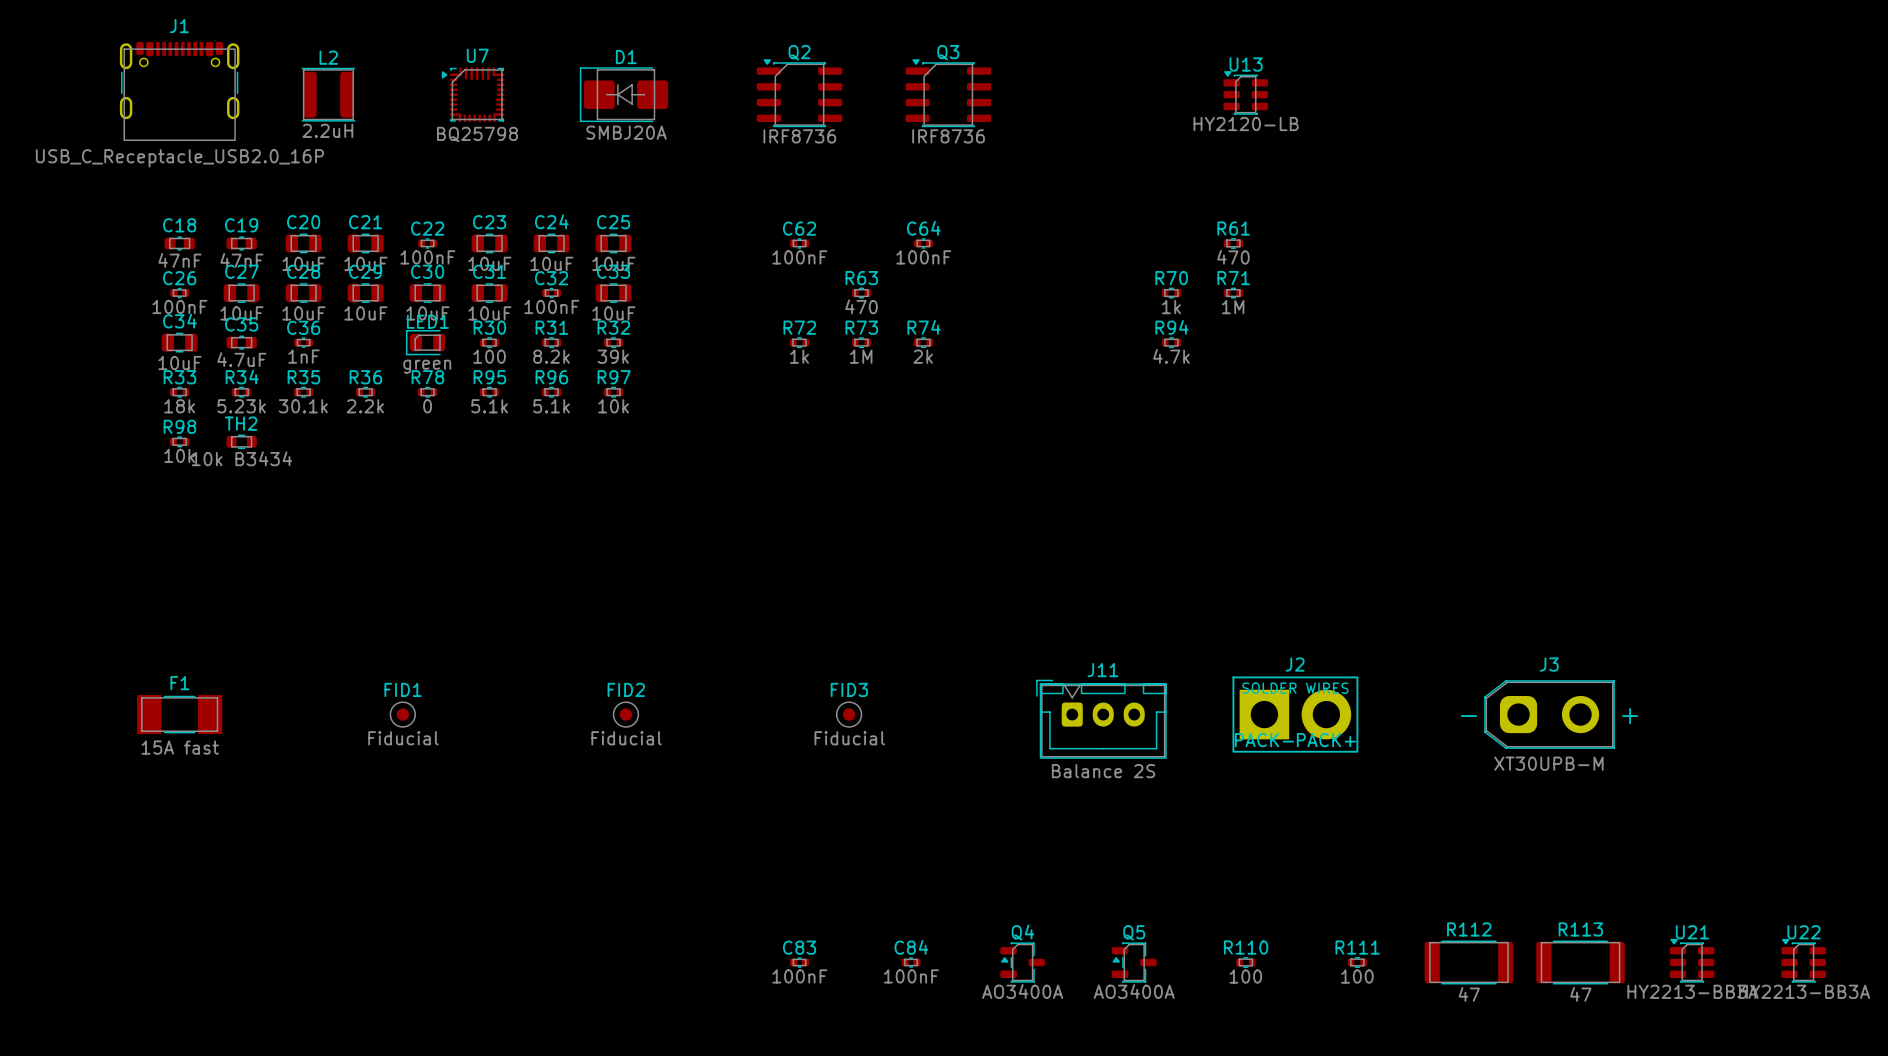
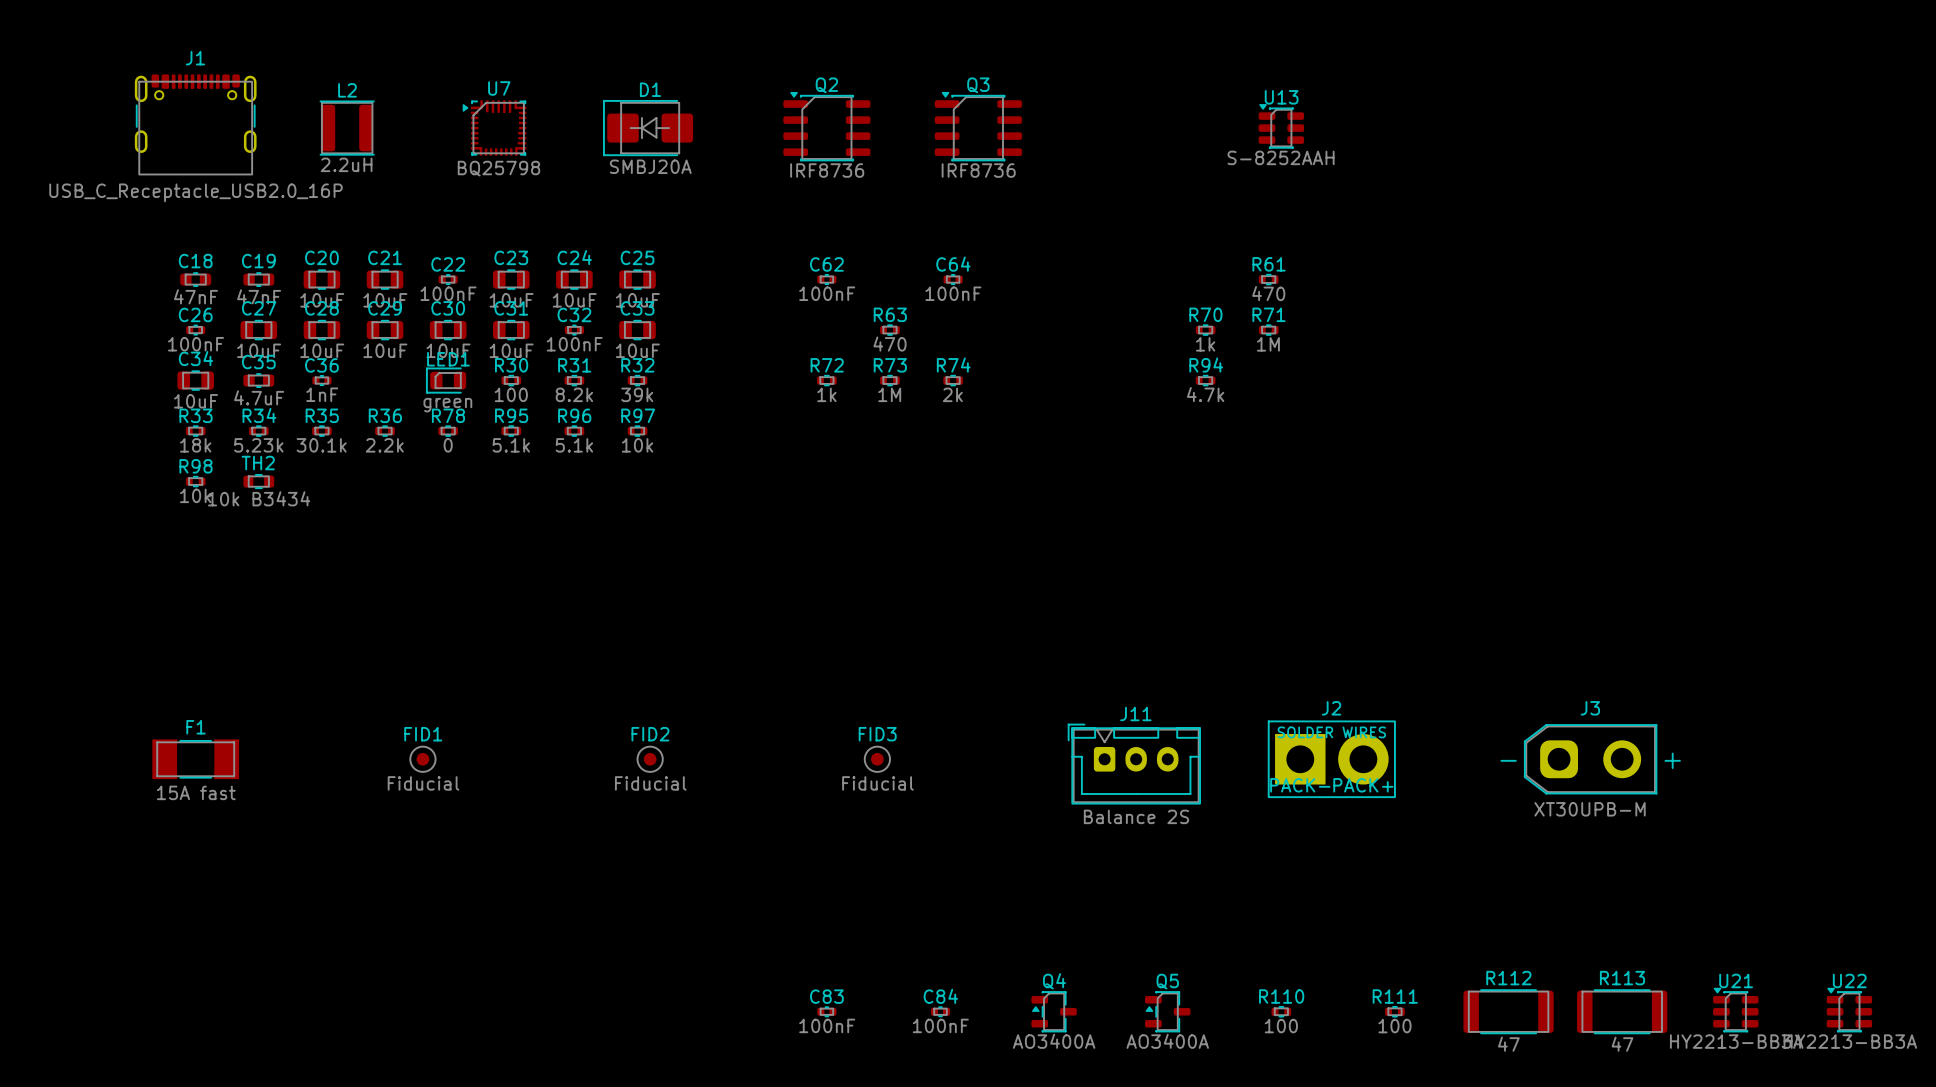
U13 value: HY2120-LB (1246, 123) -> S-8252AAH (1281, 157)

